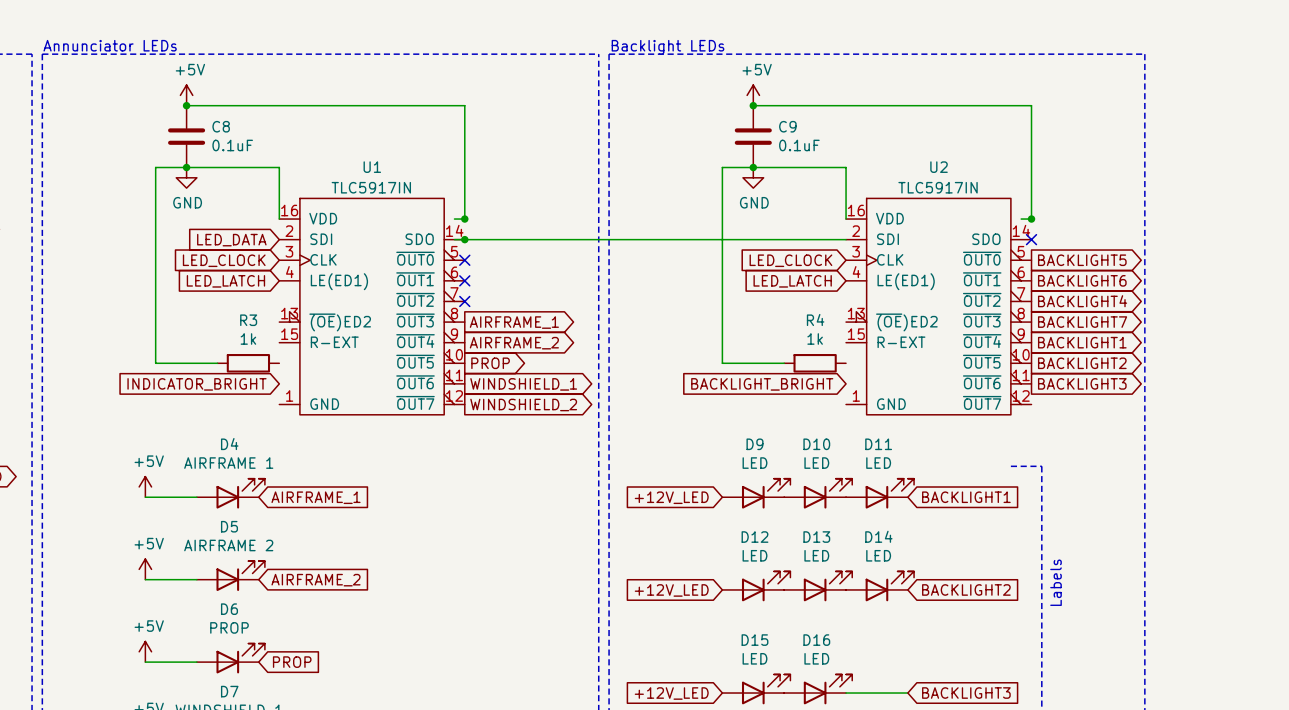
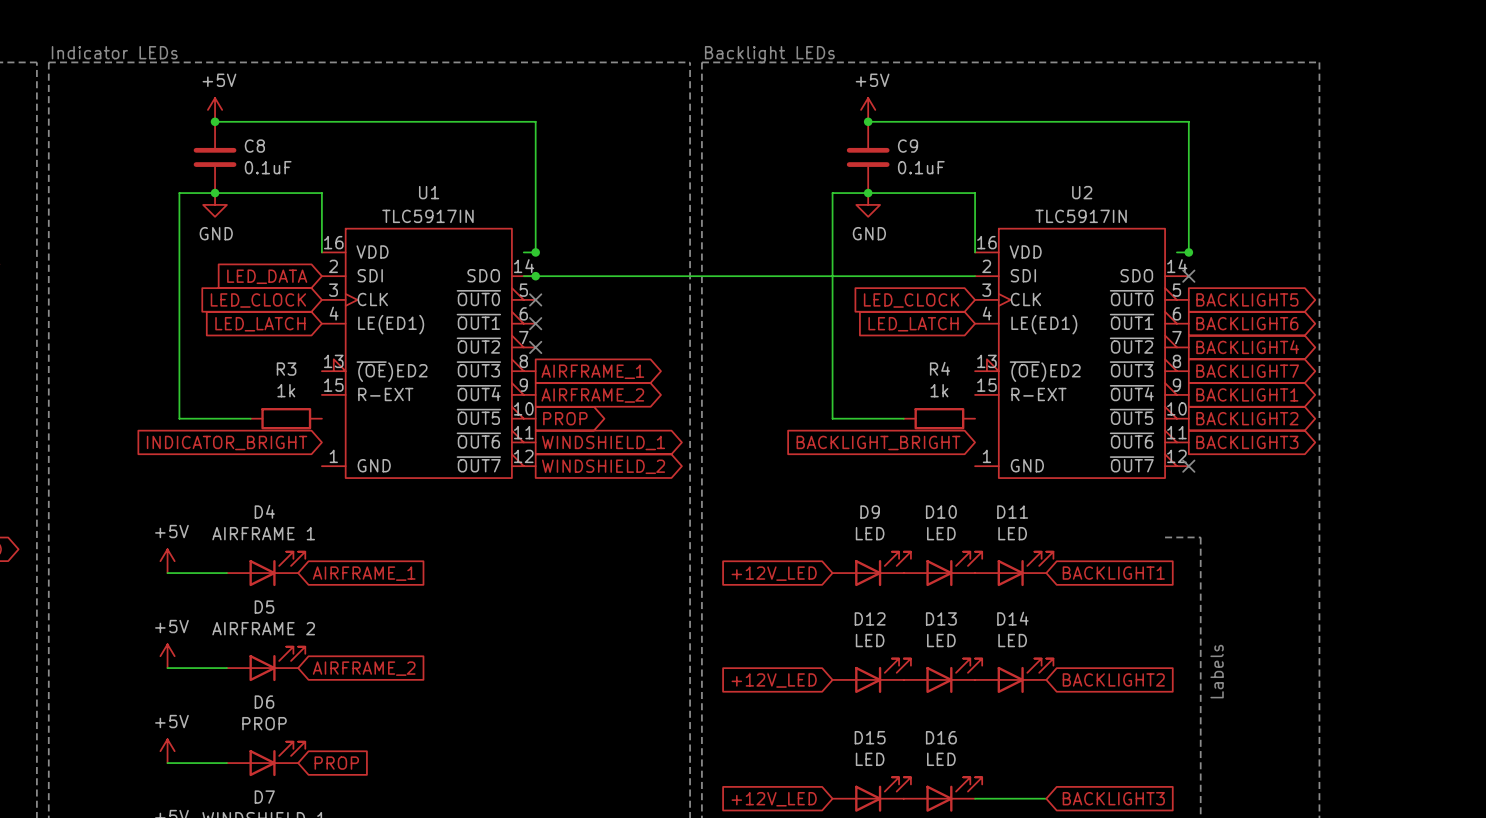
text: Annunciator LEDs (110, 45) -> Indicator LEDs (114, 52)
no-connect mark: none -> (1188, 466)

